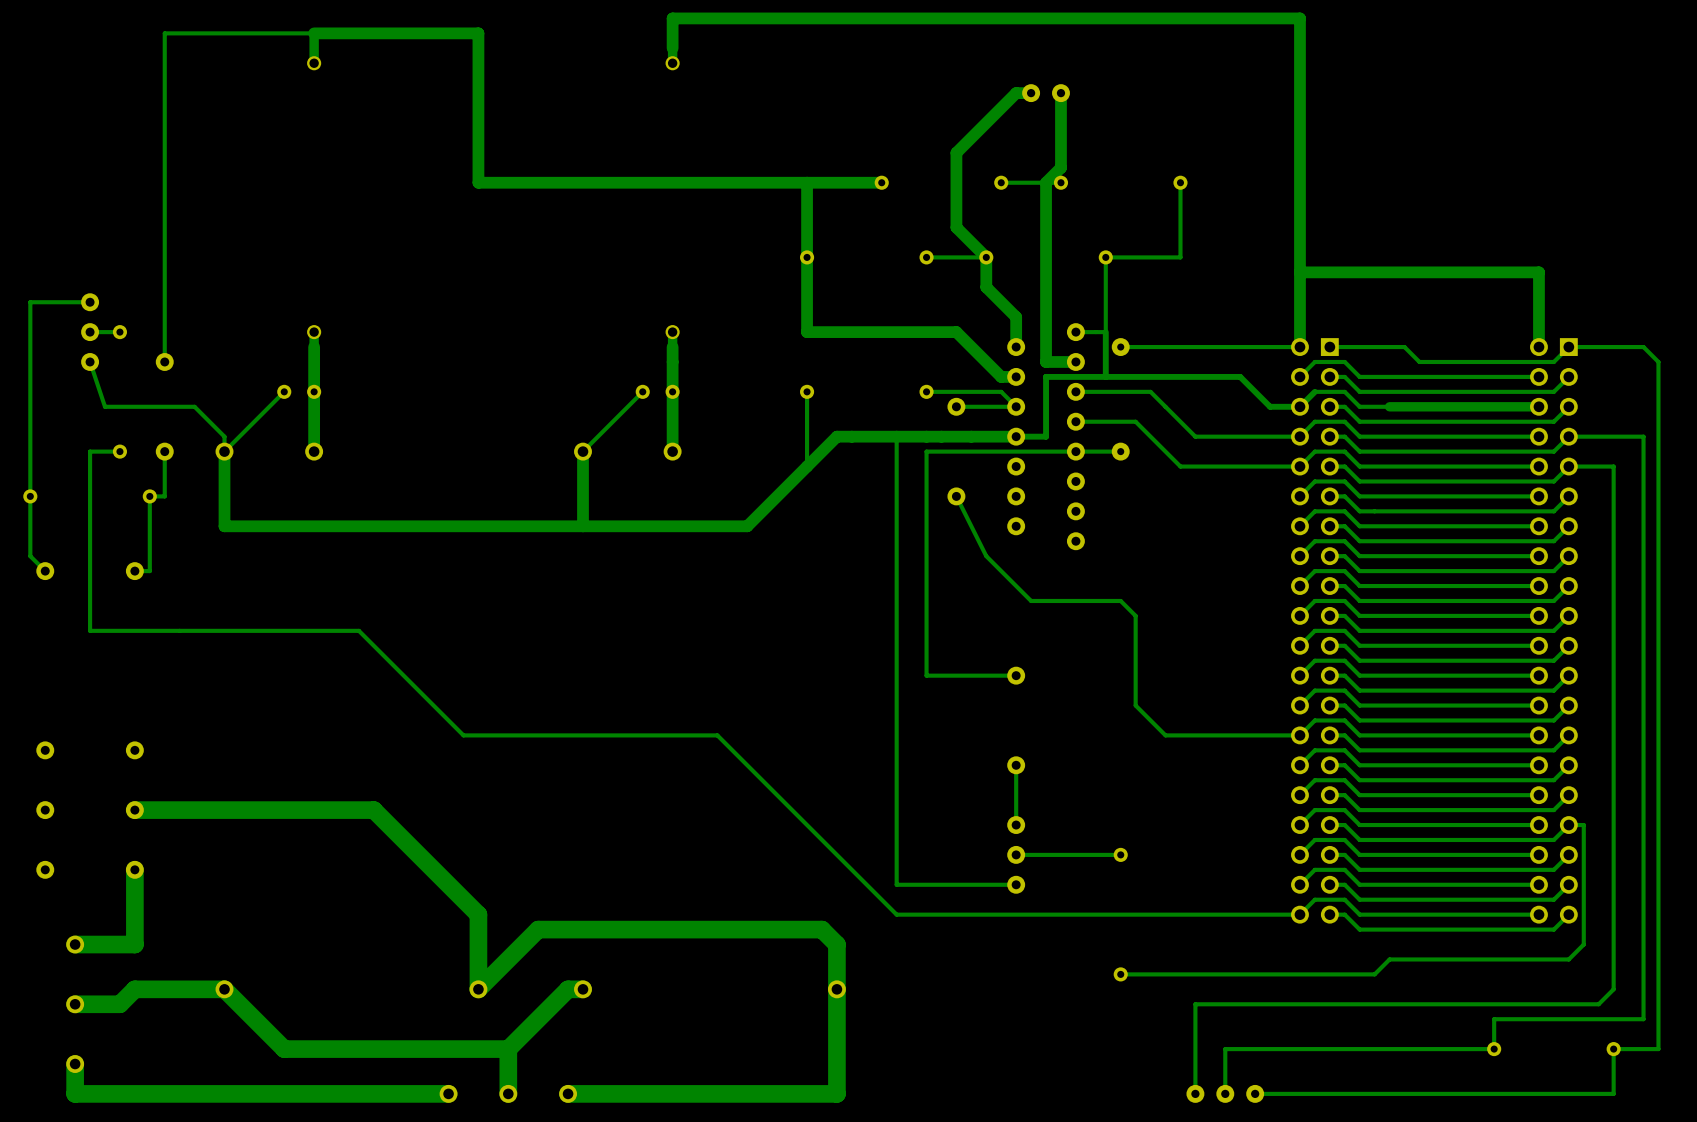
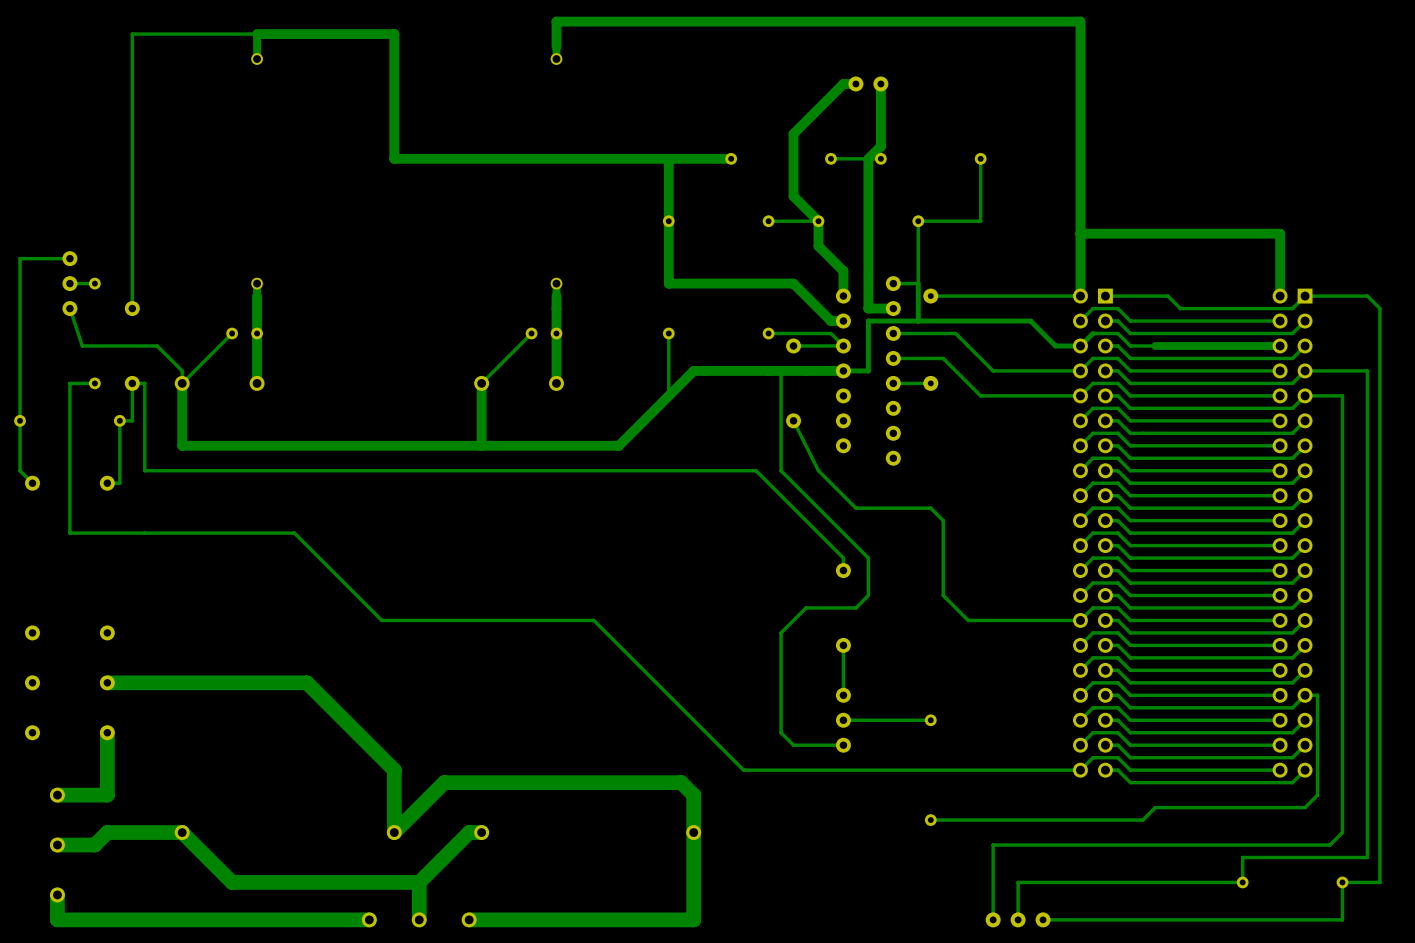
track: (896, 436) (896, 884) (956, 884) -> (781, 370) (781, 470) (868, 558) (868, 595) (855, 607) (806, 607) (781, 632) (781, 732) (793, 745)
track: (1075, 451) (926, 451) (926, 675) (1016, 675) -> (132, 383) (144, 383) (144, 470) (756, 470) (843, 558) (843, 570)

